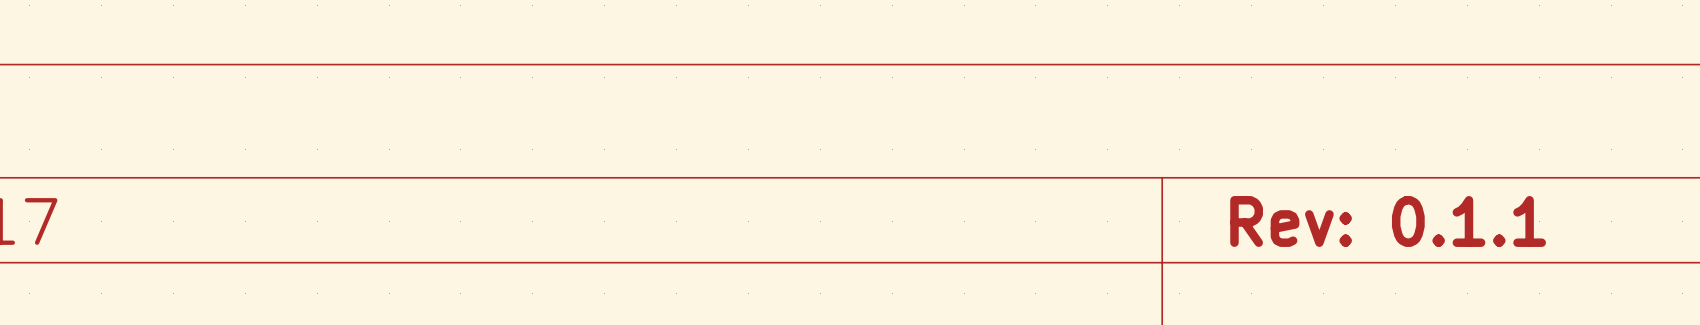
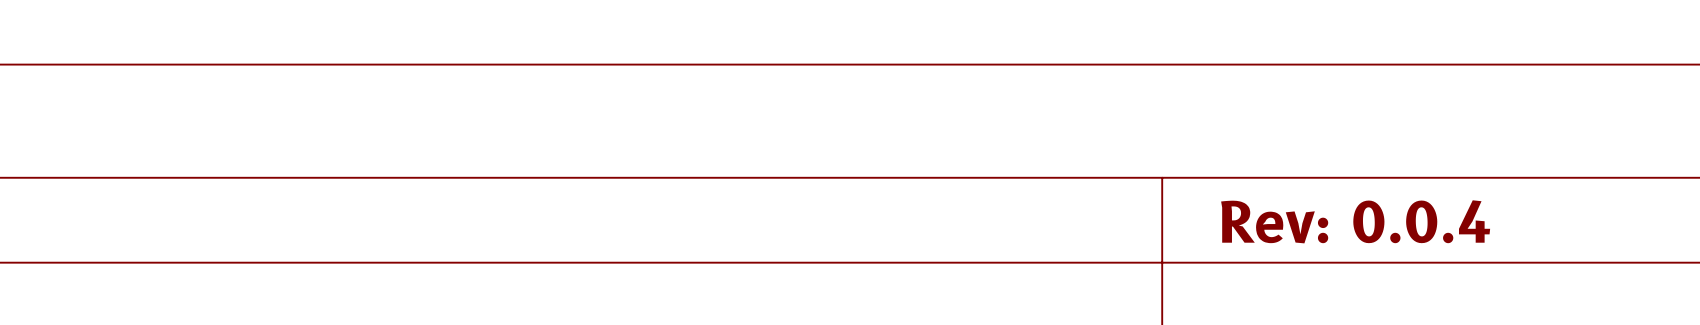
title block: Rev: 0.1.1 (1388, 221) -> Rev: 0.0.4 (1355, 221)

